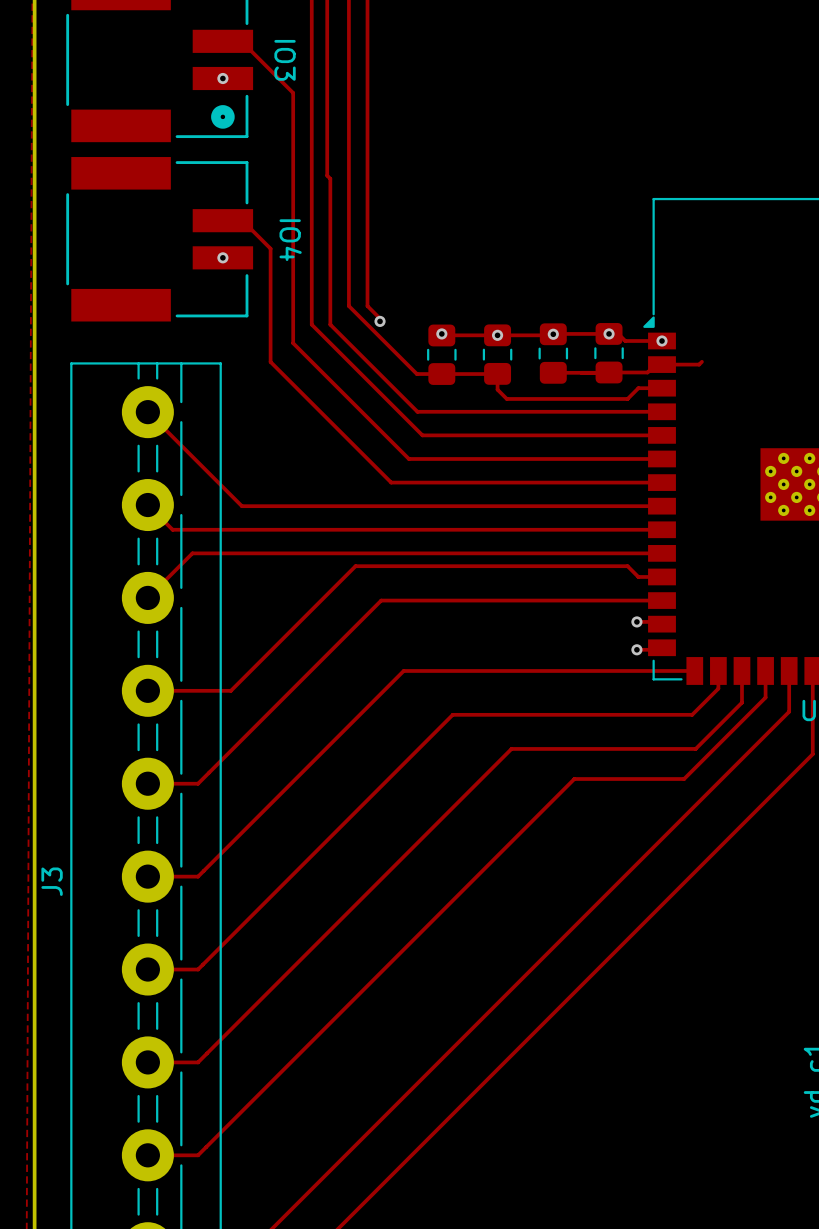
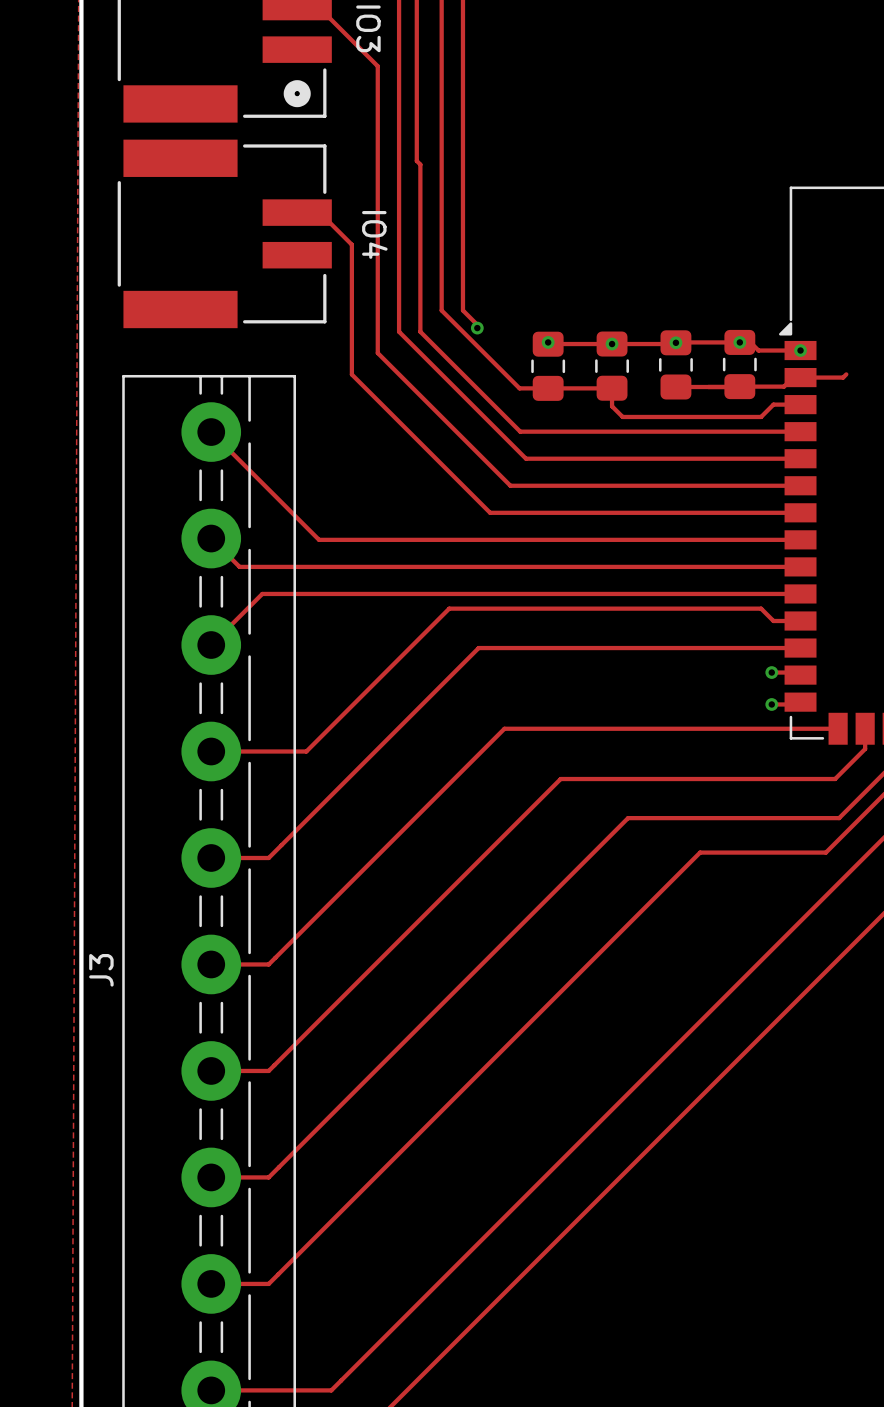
via: (222, 78) -> none
via: (222, 257) -> none

